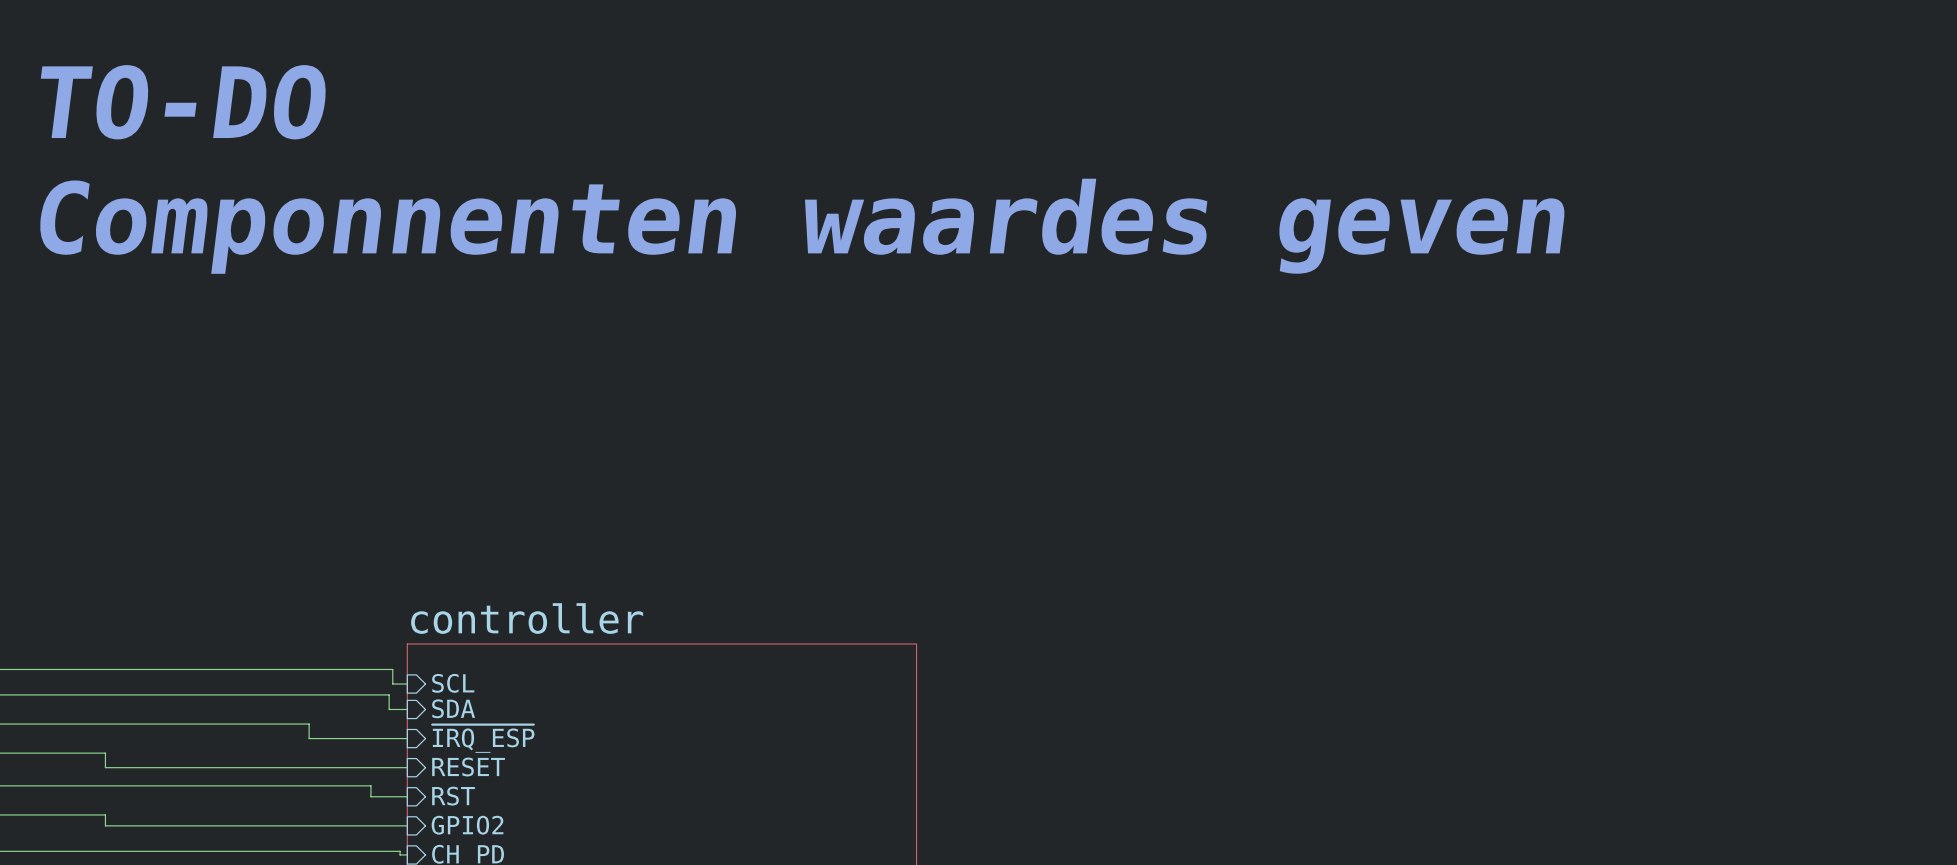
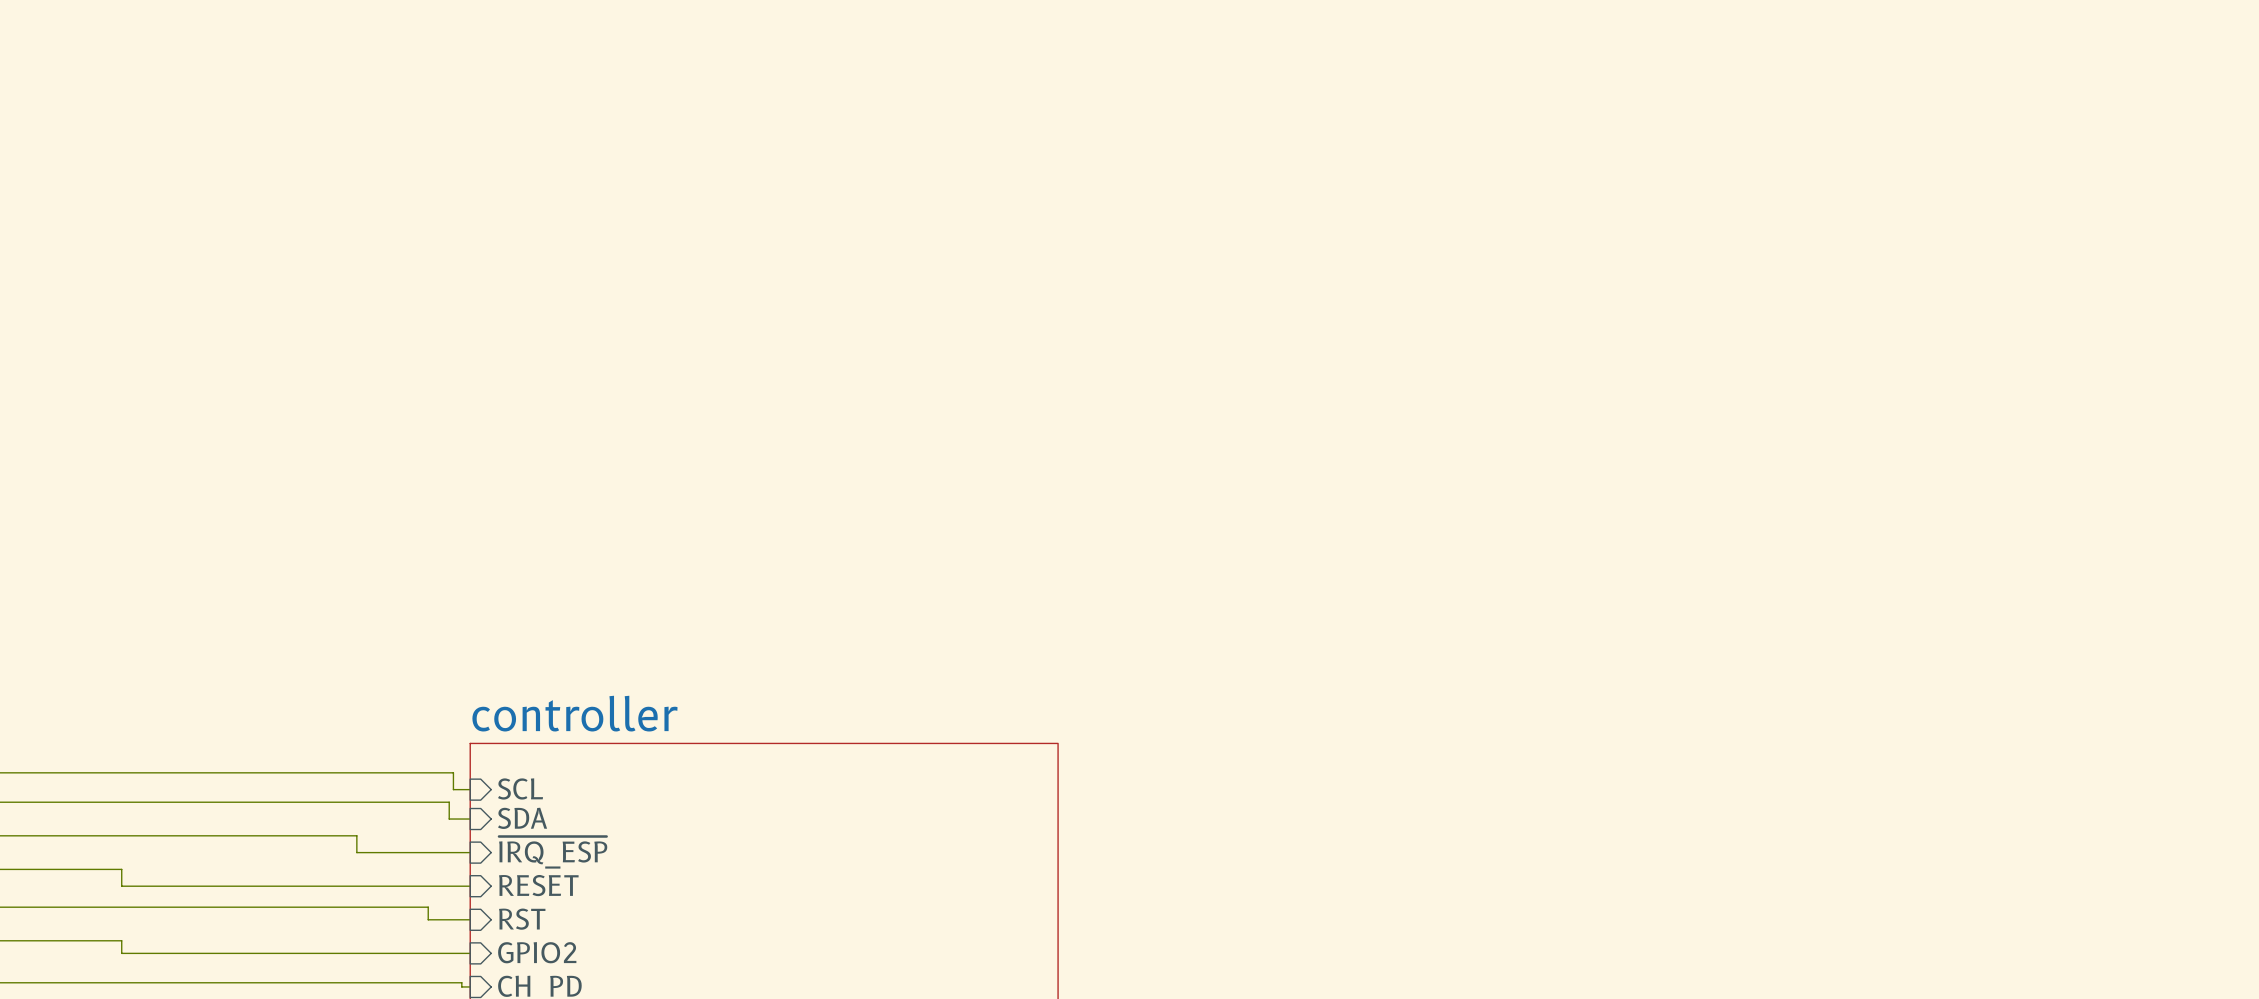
text: TO-DO (184, 102) -> none
text: Componnenten waardes geven (801, 226) -> none

